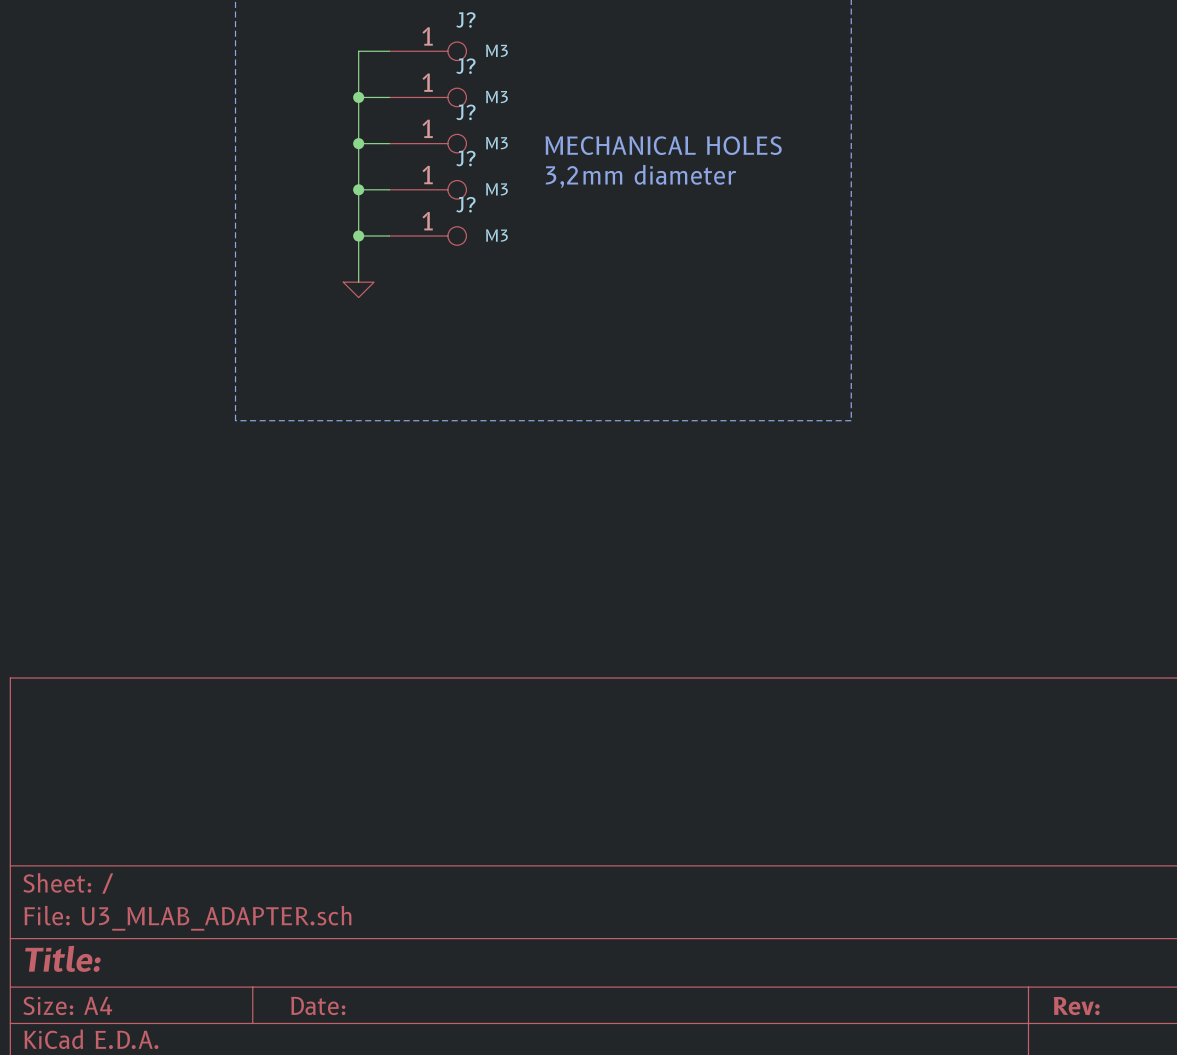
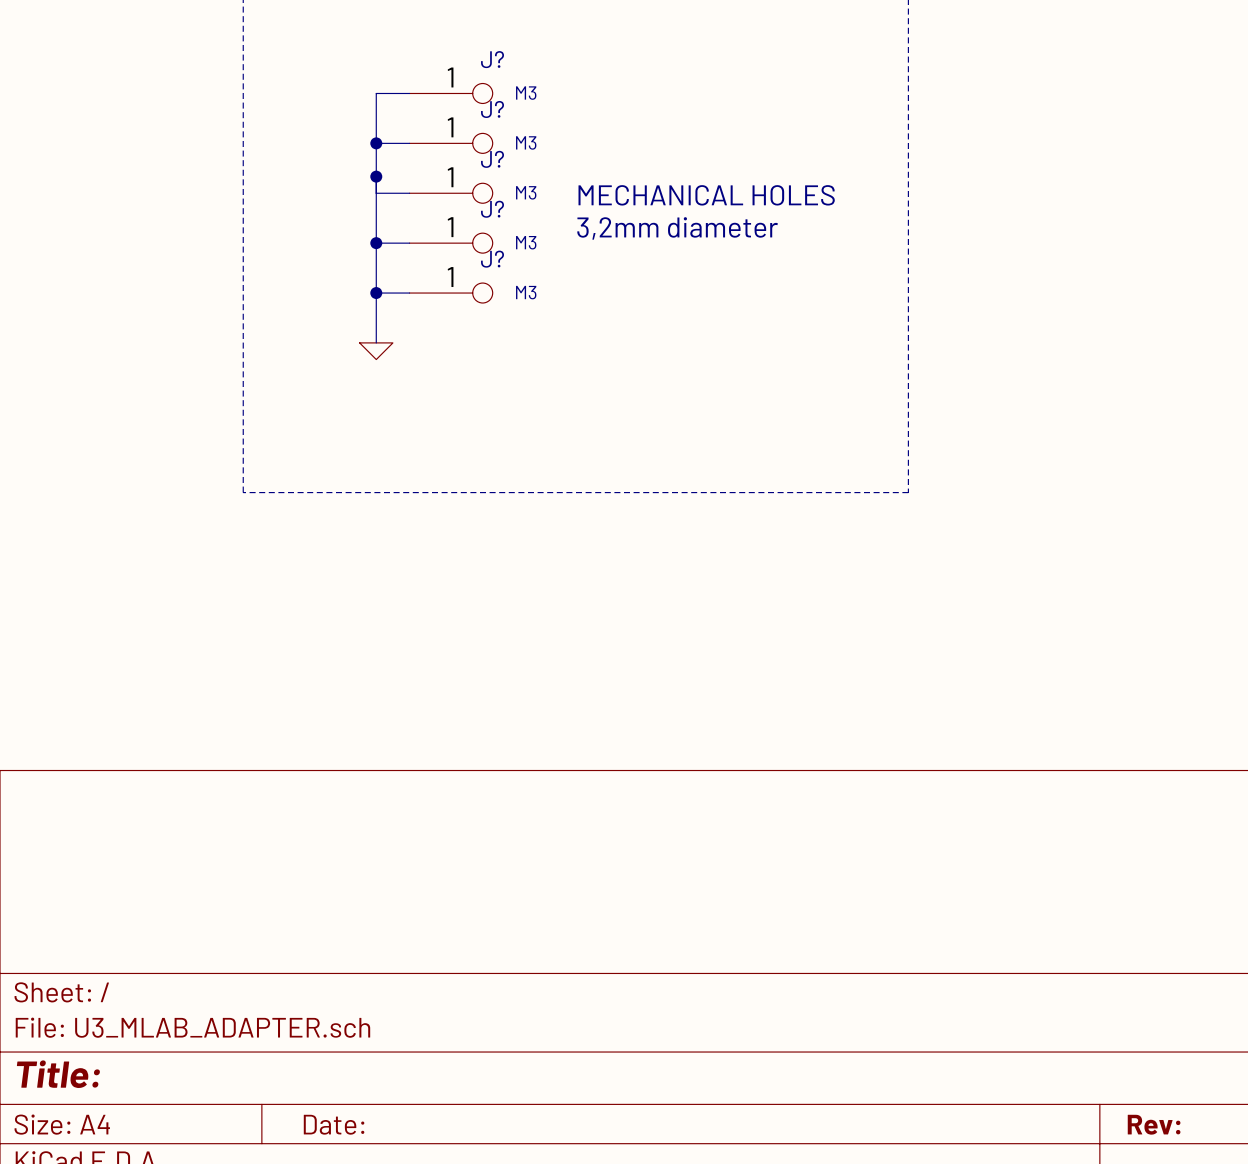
junction position: (358, 143) -> (376, 176)

